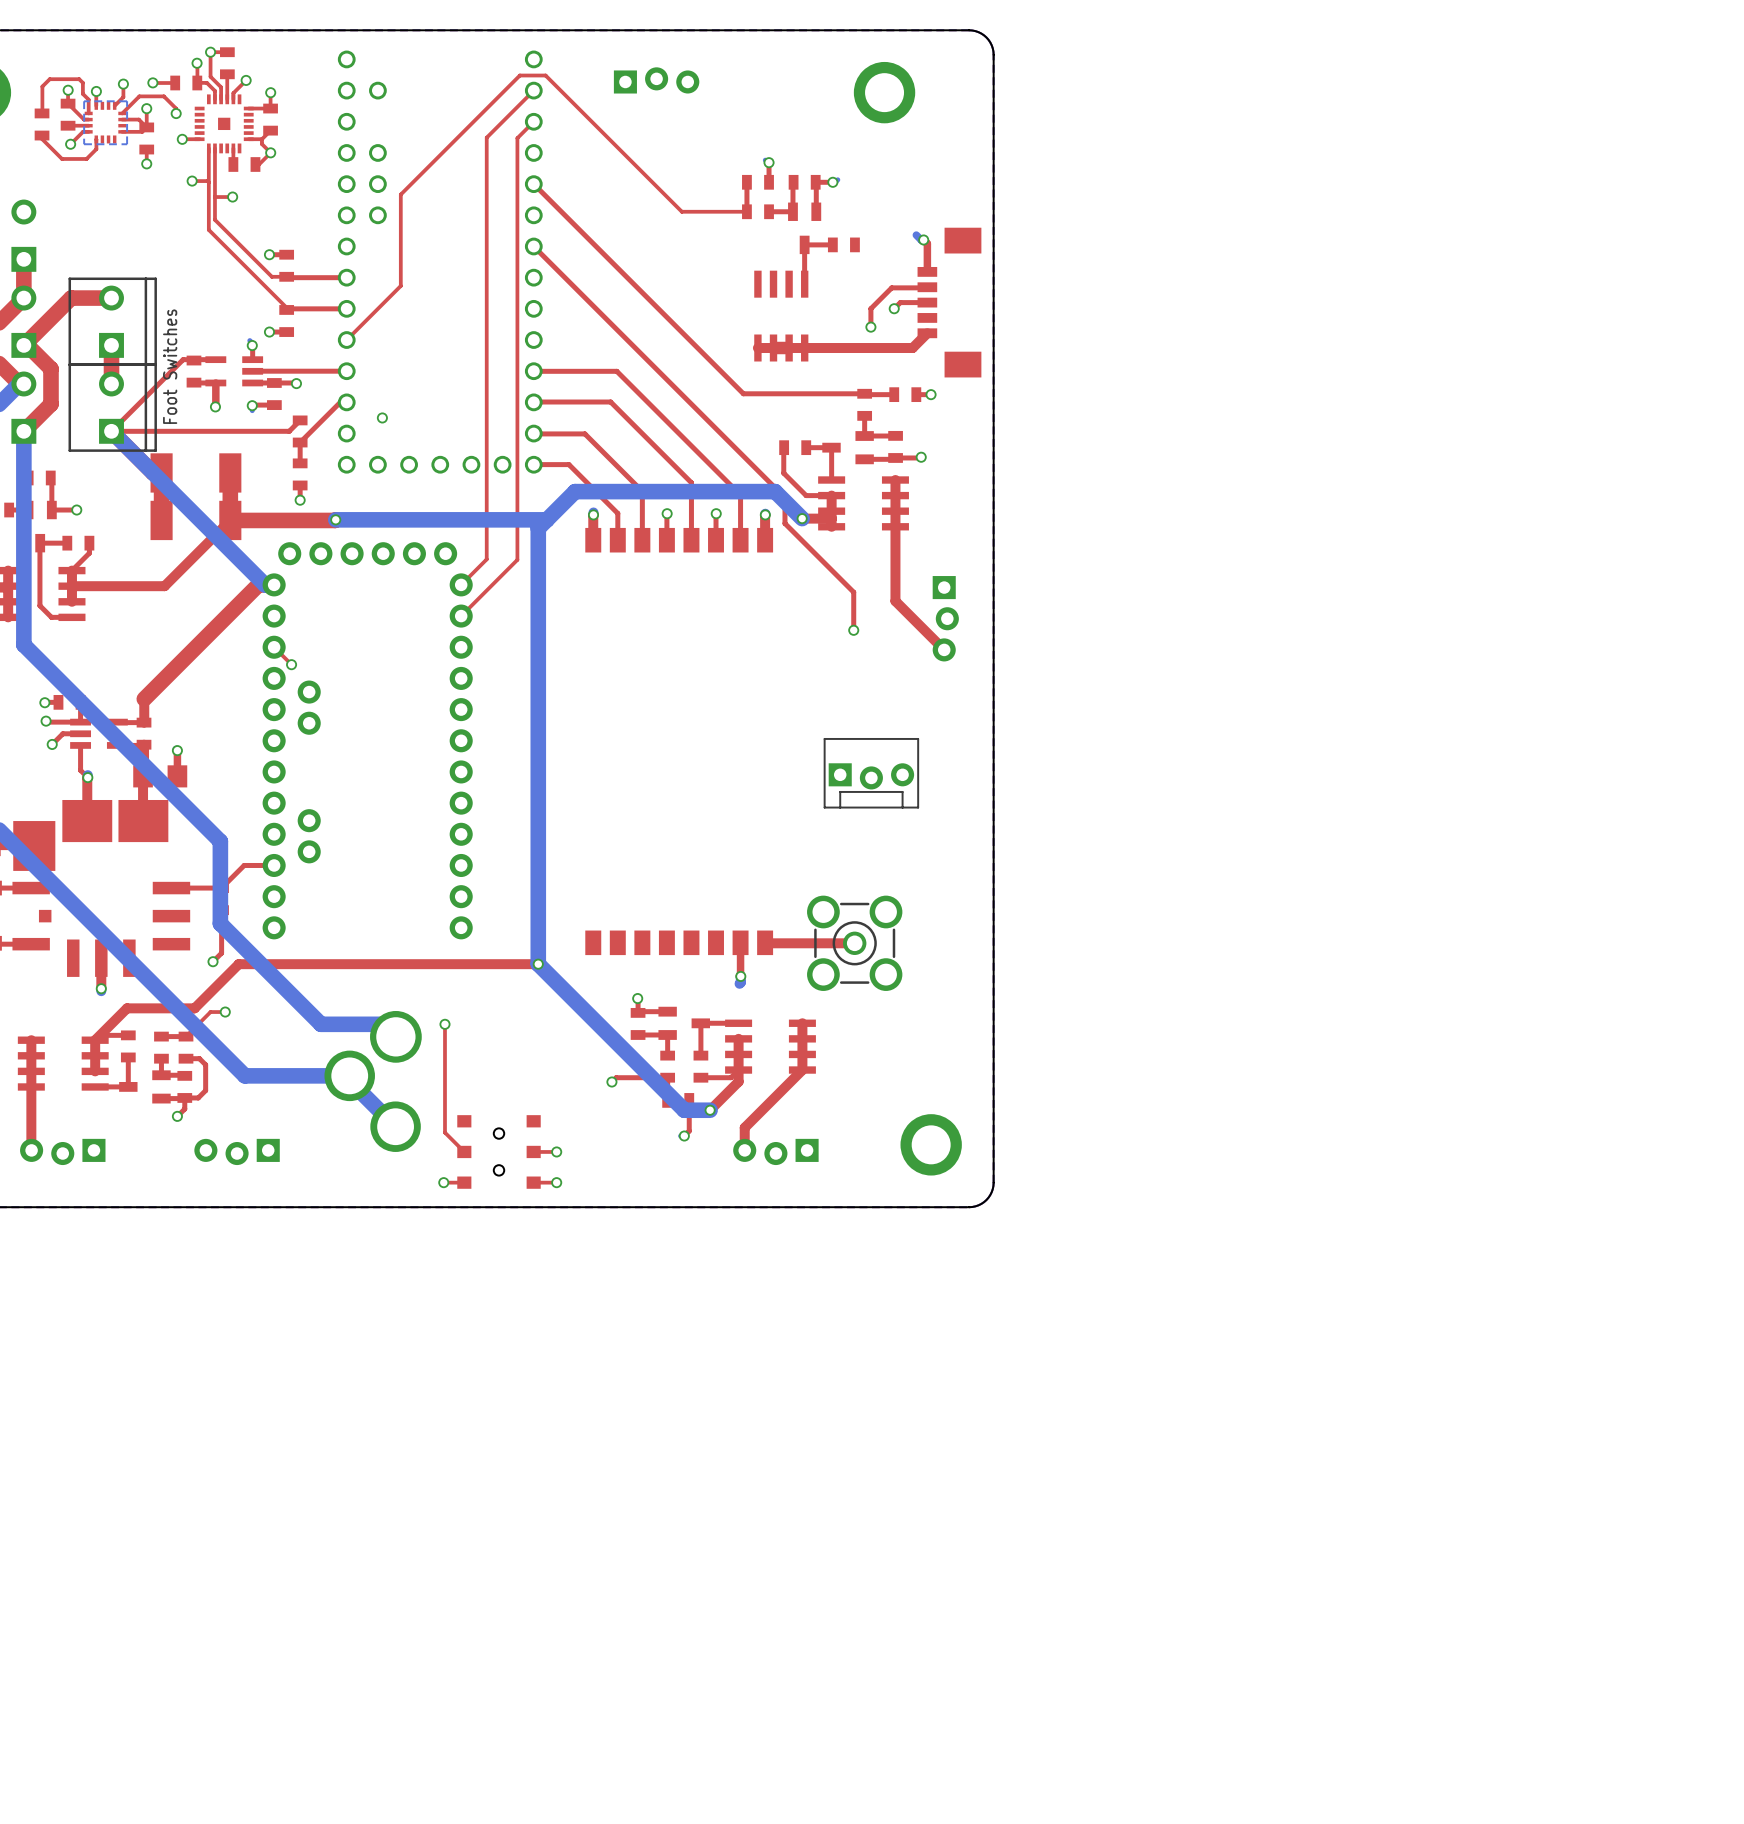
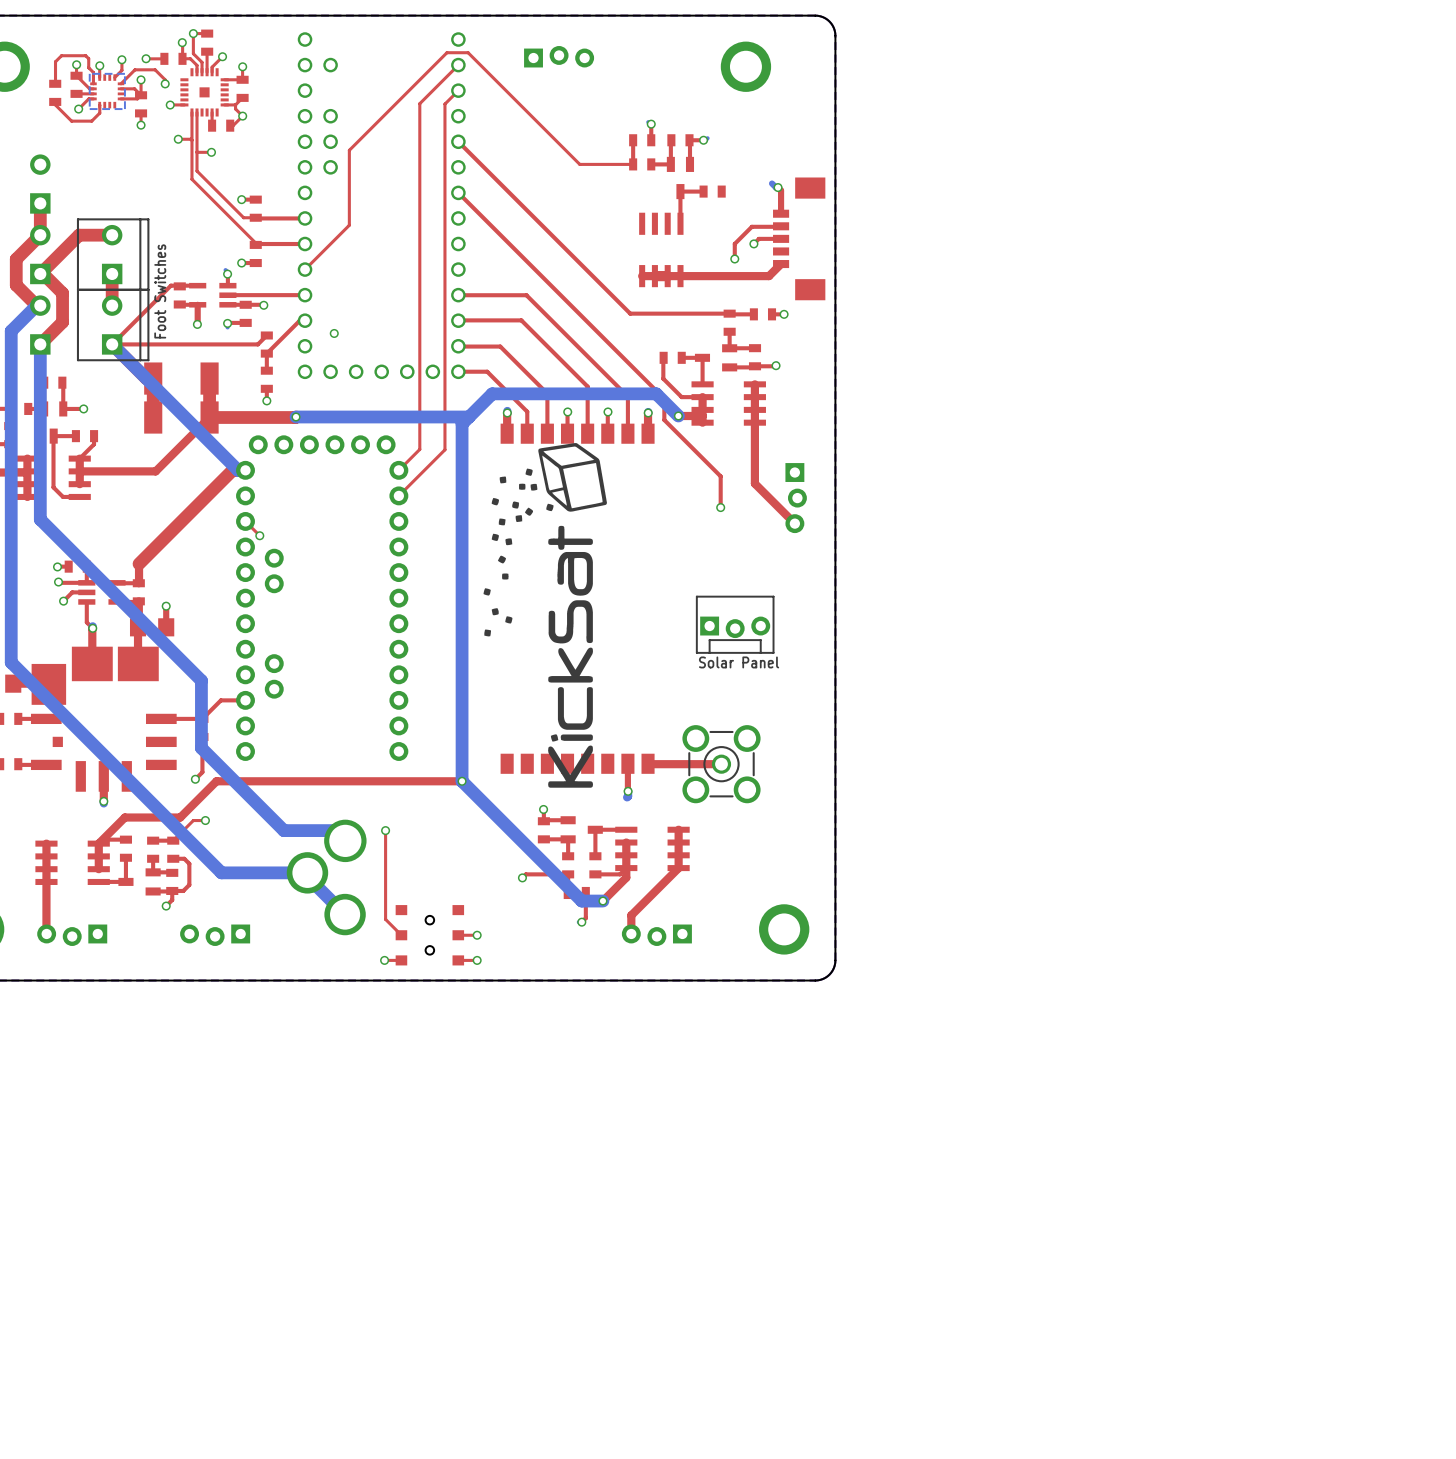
drawing: none -> [483, 443, 607, 788]
text: none -> Solar Panel (739, 662)

